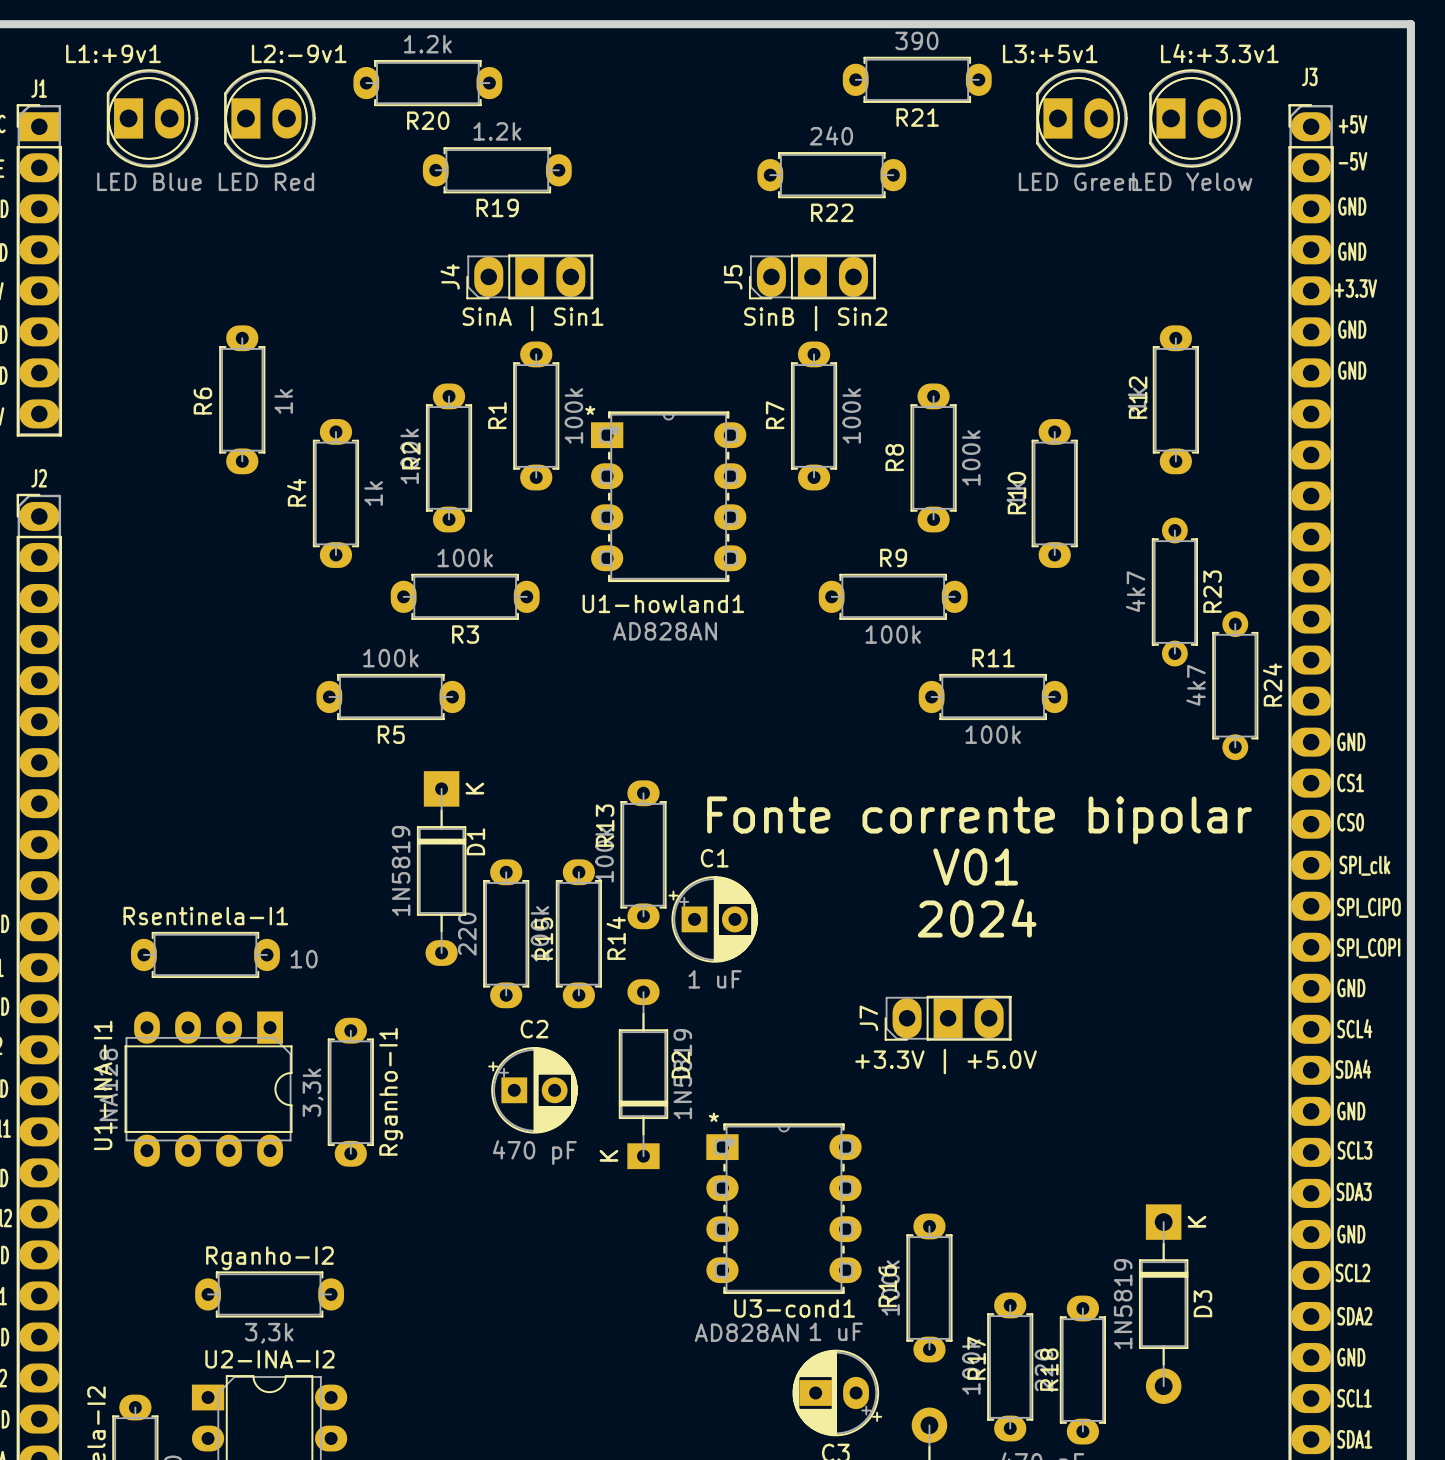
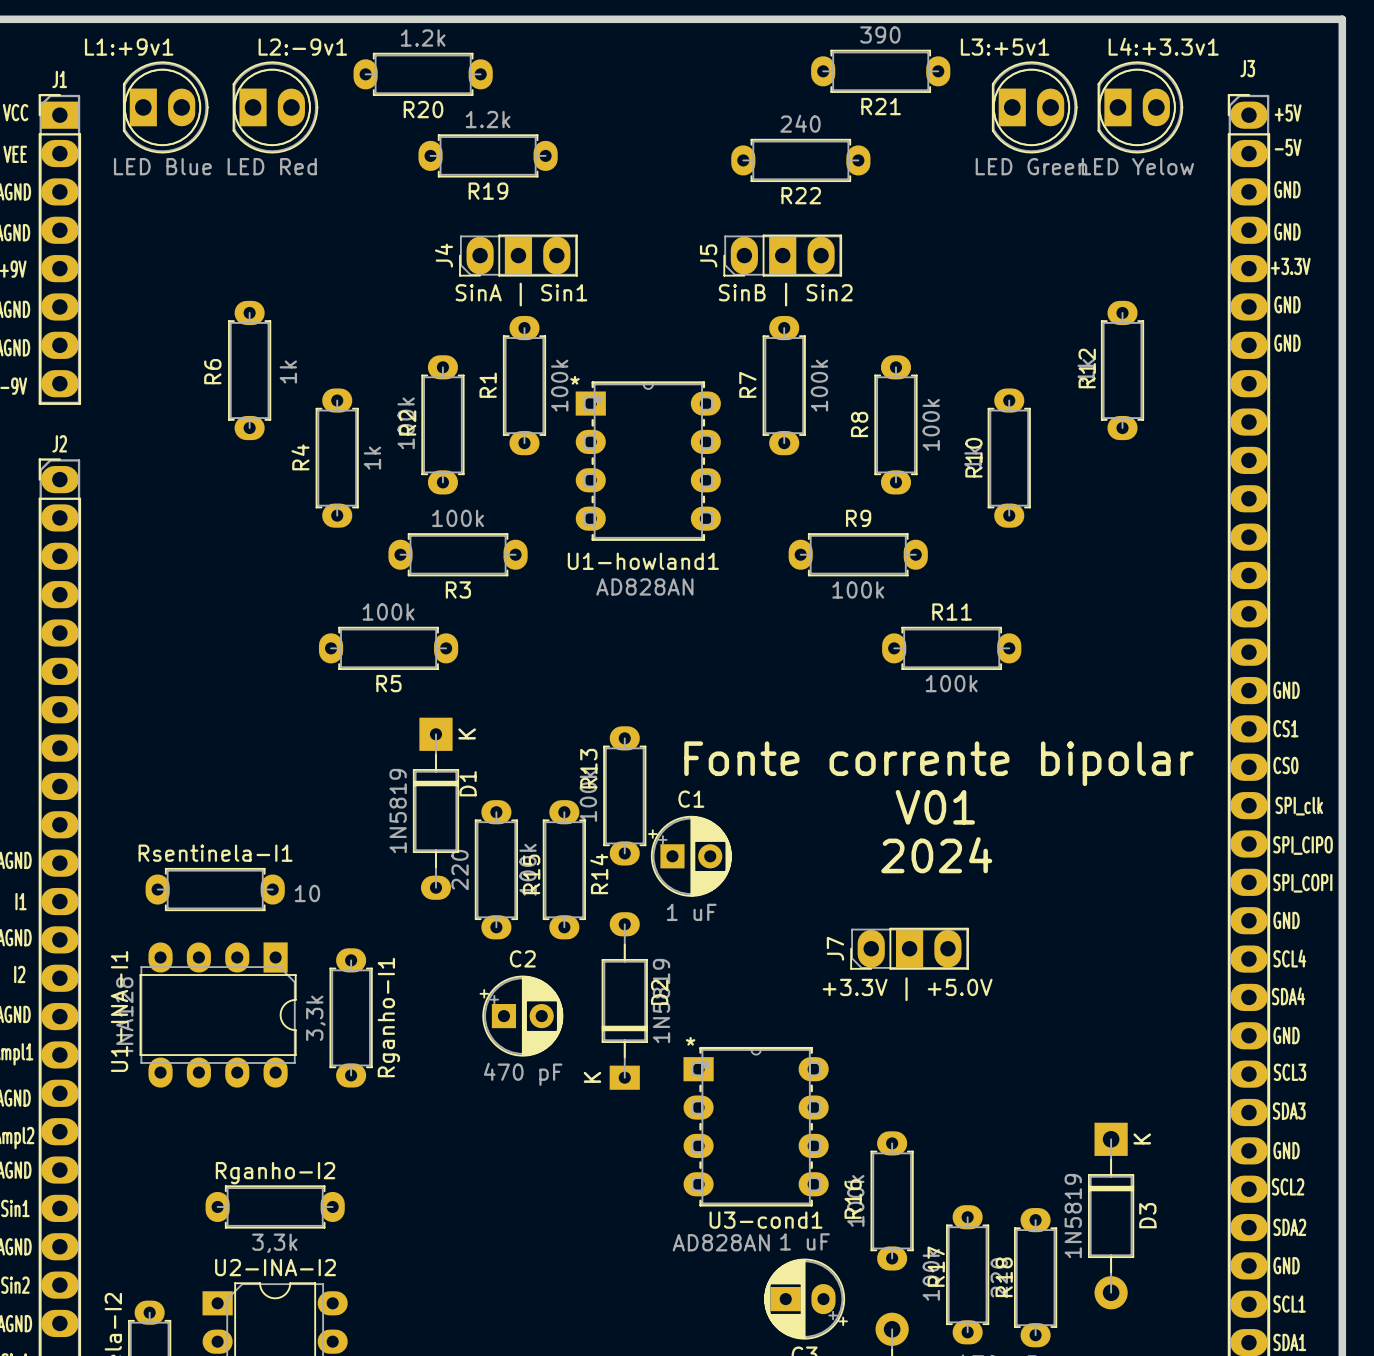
R23: 4k7 (1174, 592) -> none
R24: 4k7 (1235, 685) -> none

